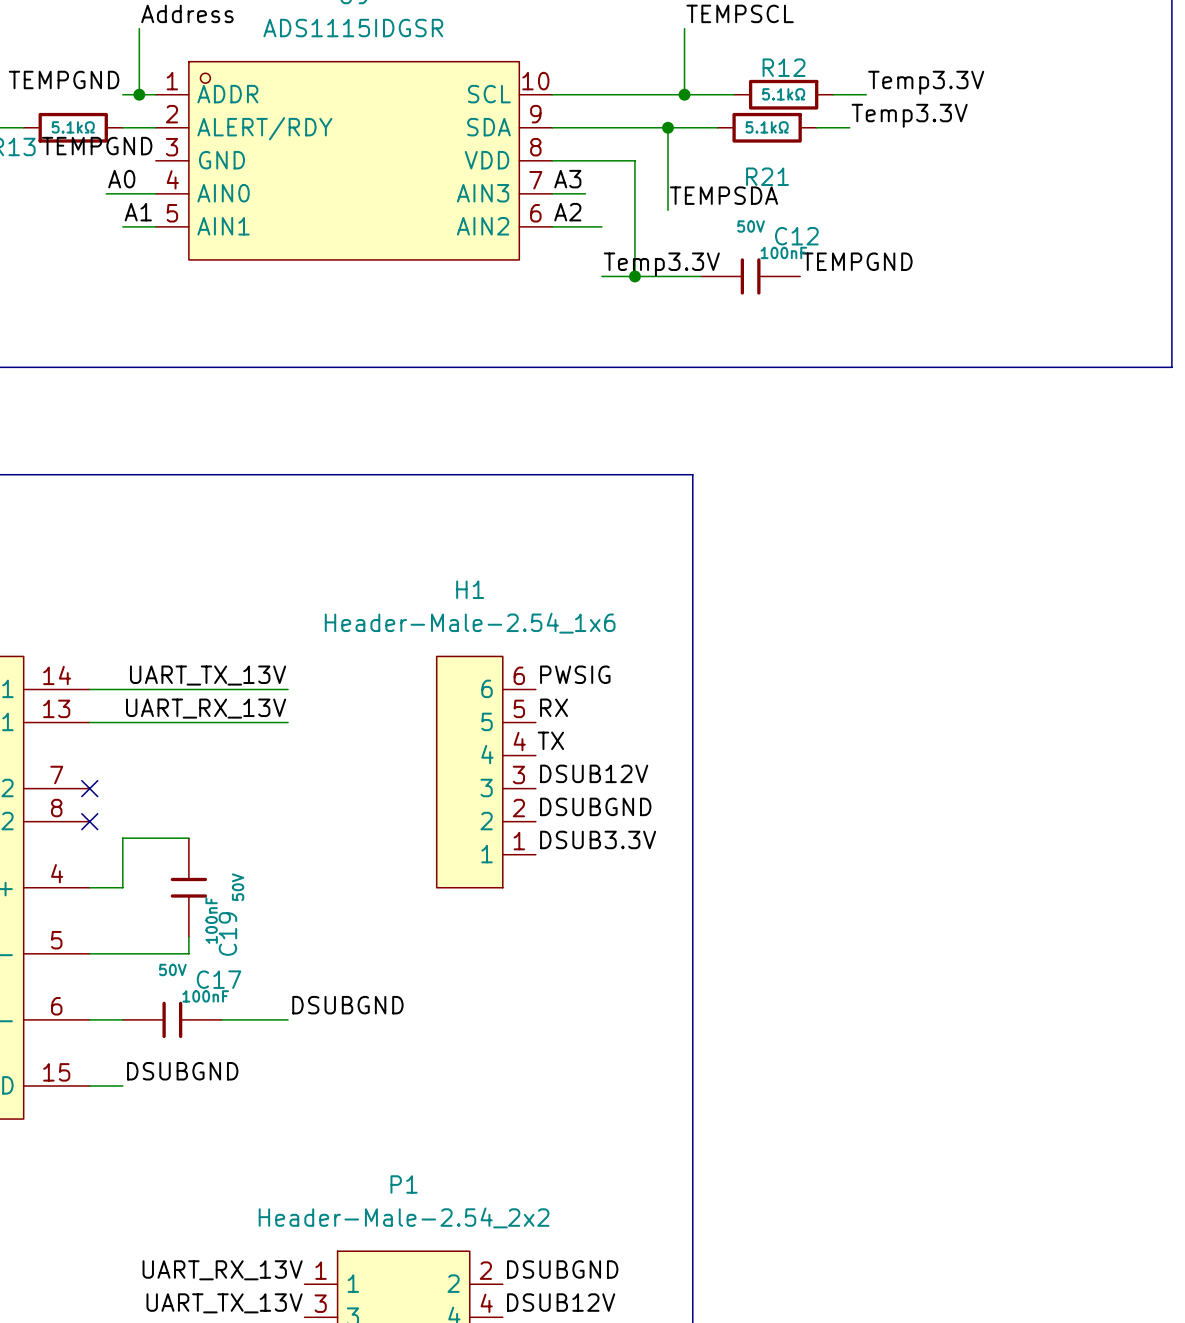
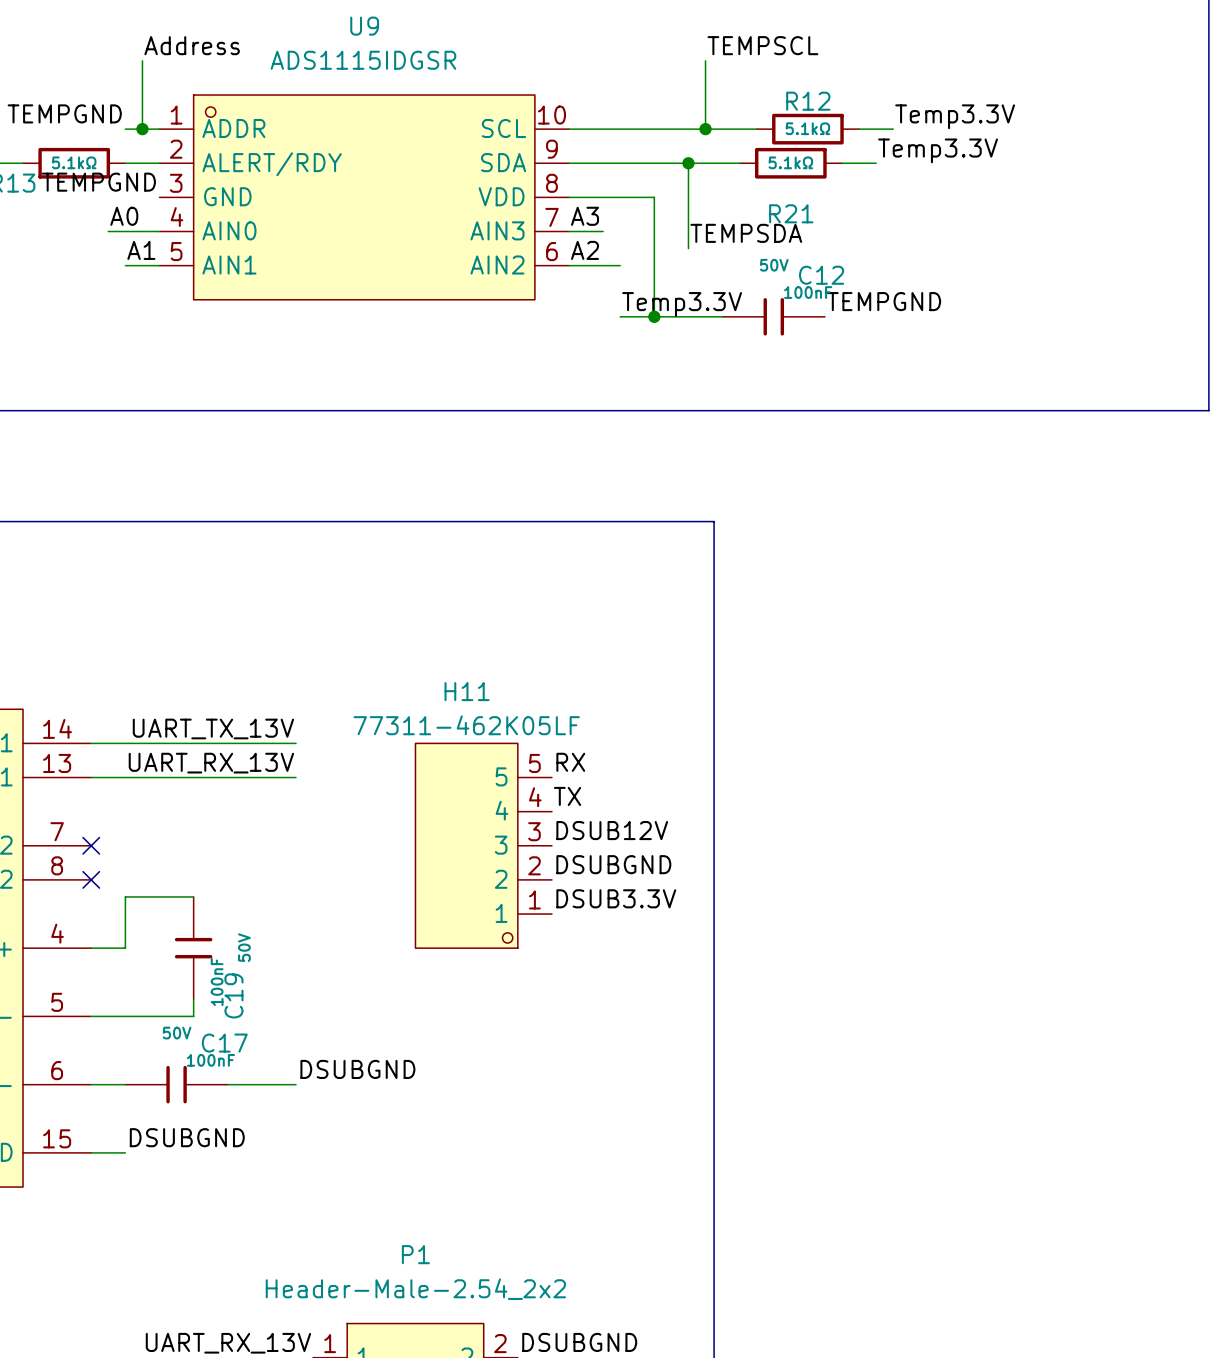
label: PWSIG (575, 674) -> none
H1: Header-Male-2.54_1x6 (486, 772) -> none
H11: none -> 77311-462K05LF (483, 845)

